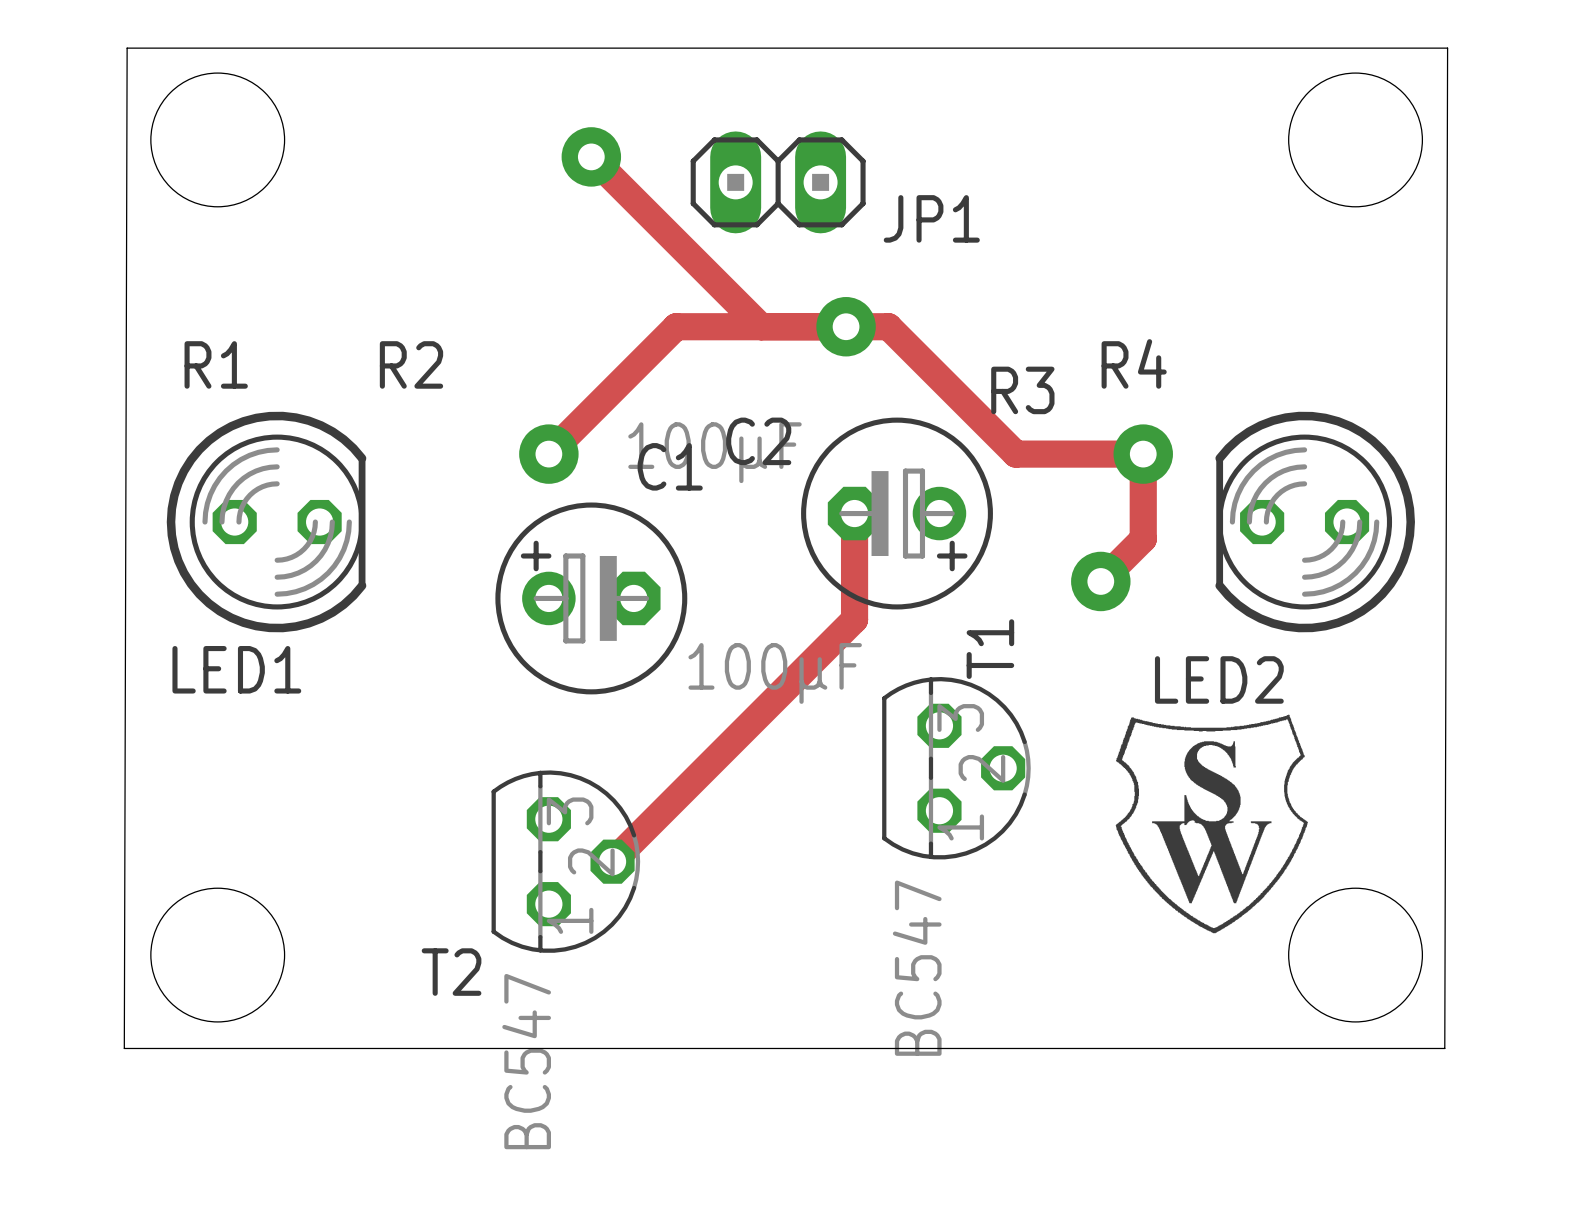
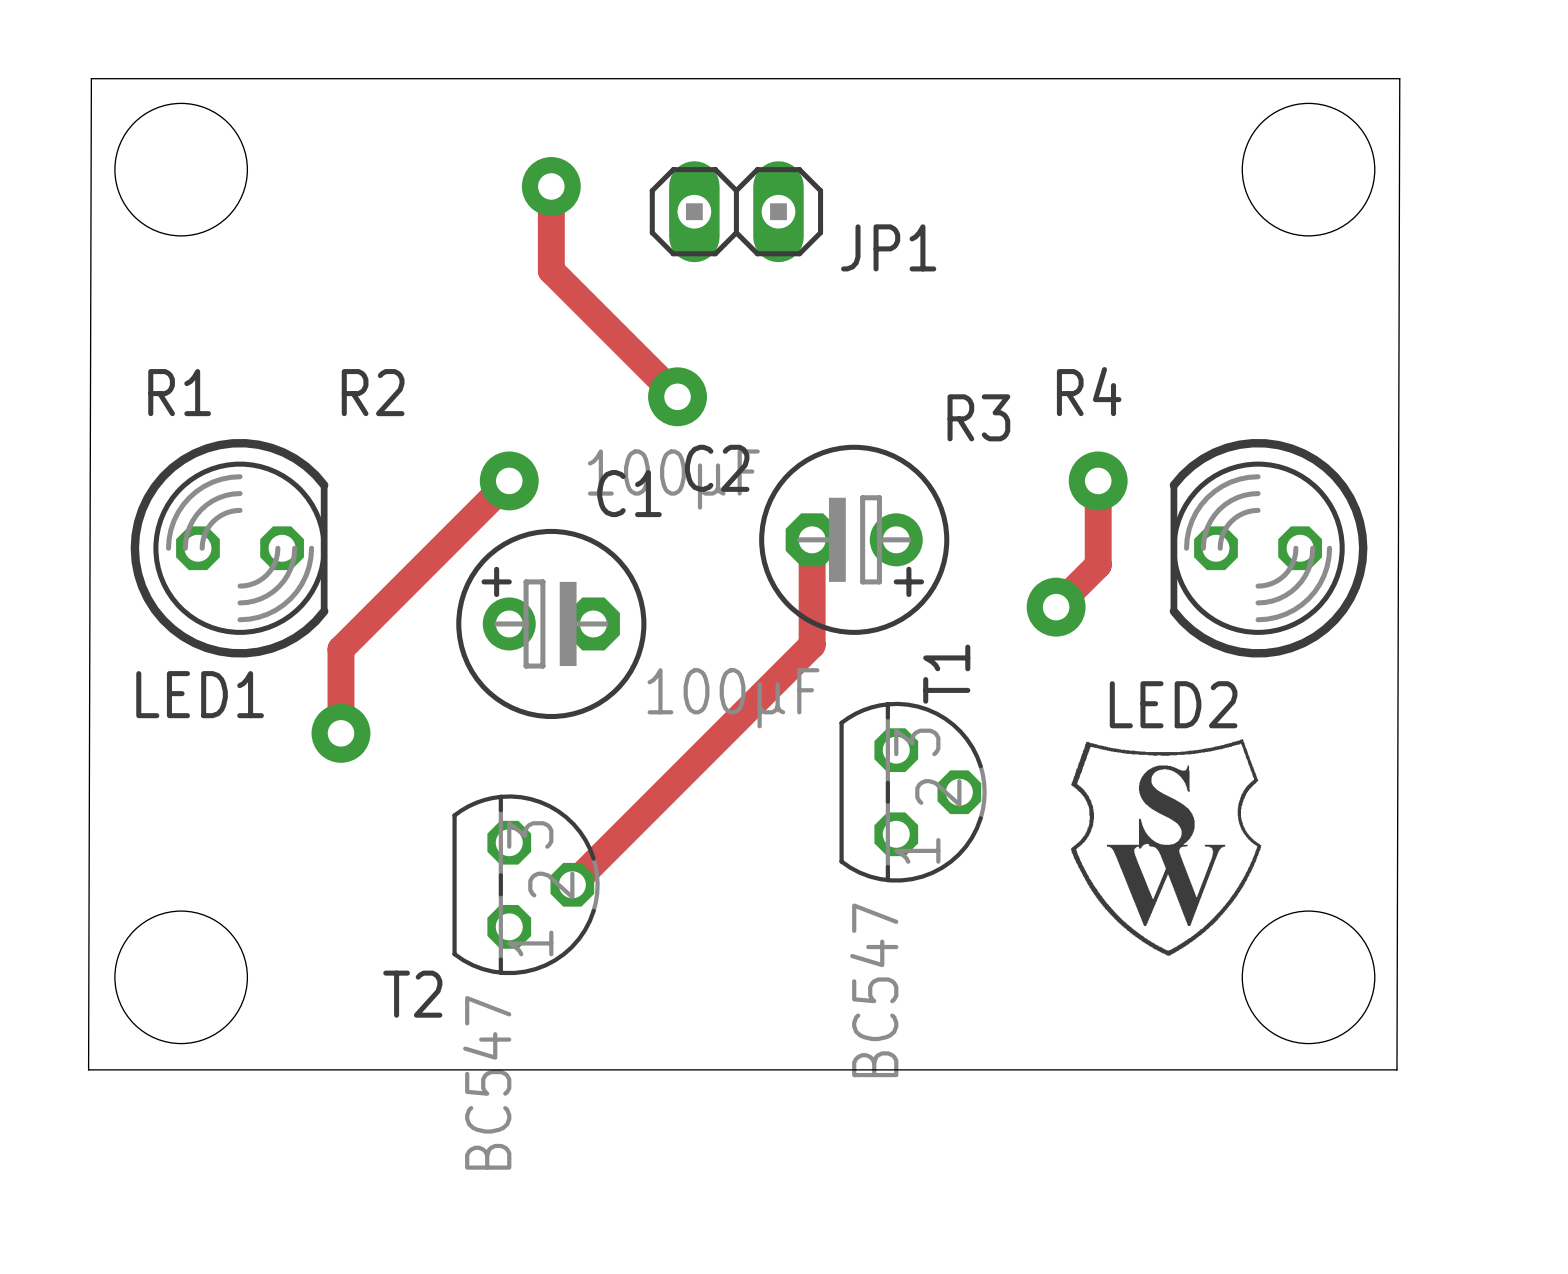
track: (591, 156) (761, 326) -> (551, 186) (551, 270) (677, 396)
via position: (846, 326) -> (677, 396)
track: (548, 454) (676, 326) (888, 326) (1015, 454) (1143, 454) -> (509, 480) (340, 649) (340, 733)
via: none -> (340, 733)

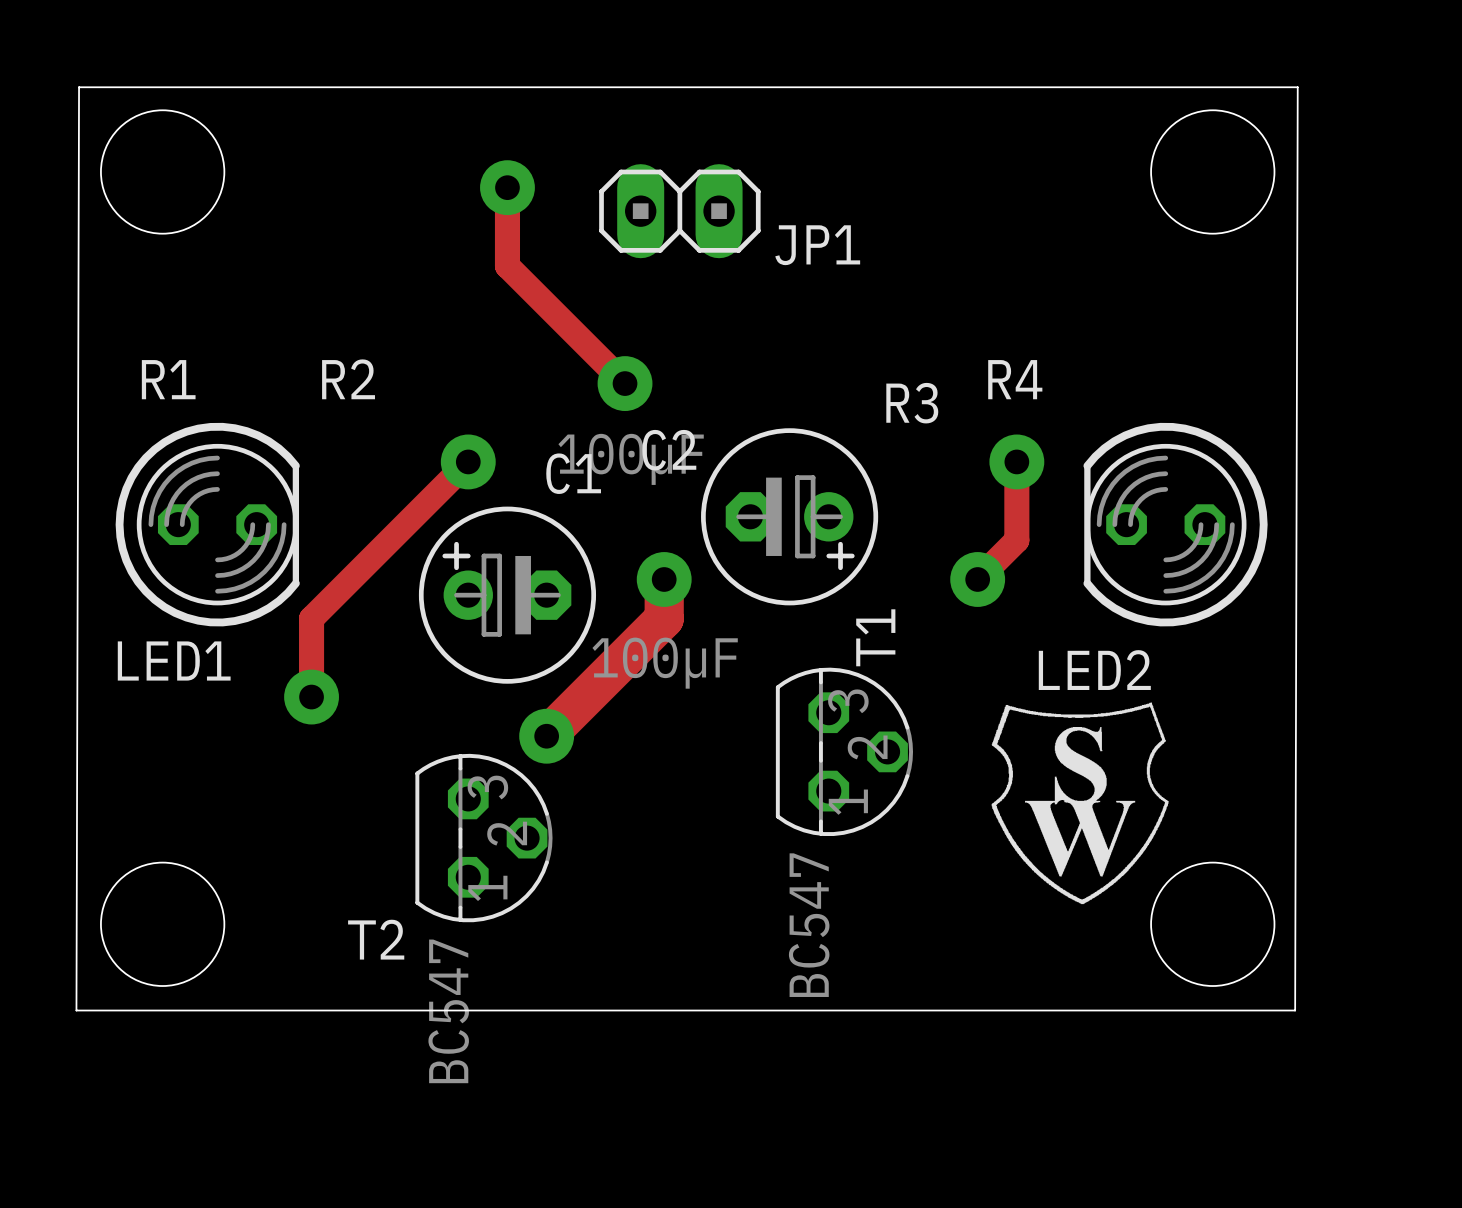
track: (812, 539) (812, 645) (572, 884) -> none
track: none -> (664, 579) (664, 618) (546, 736)
via: none -> (664, 579)
via: none -> (546, 736)

